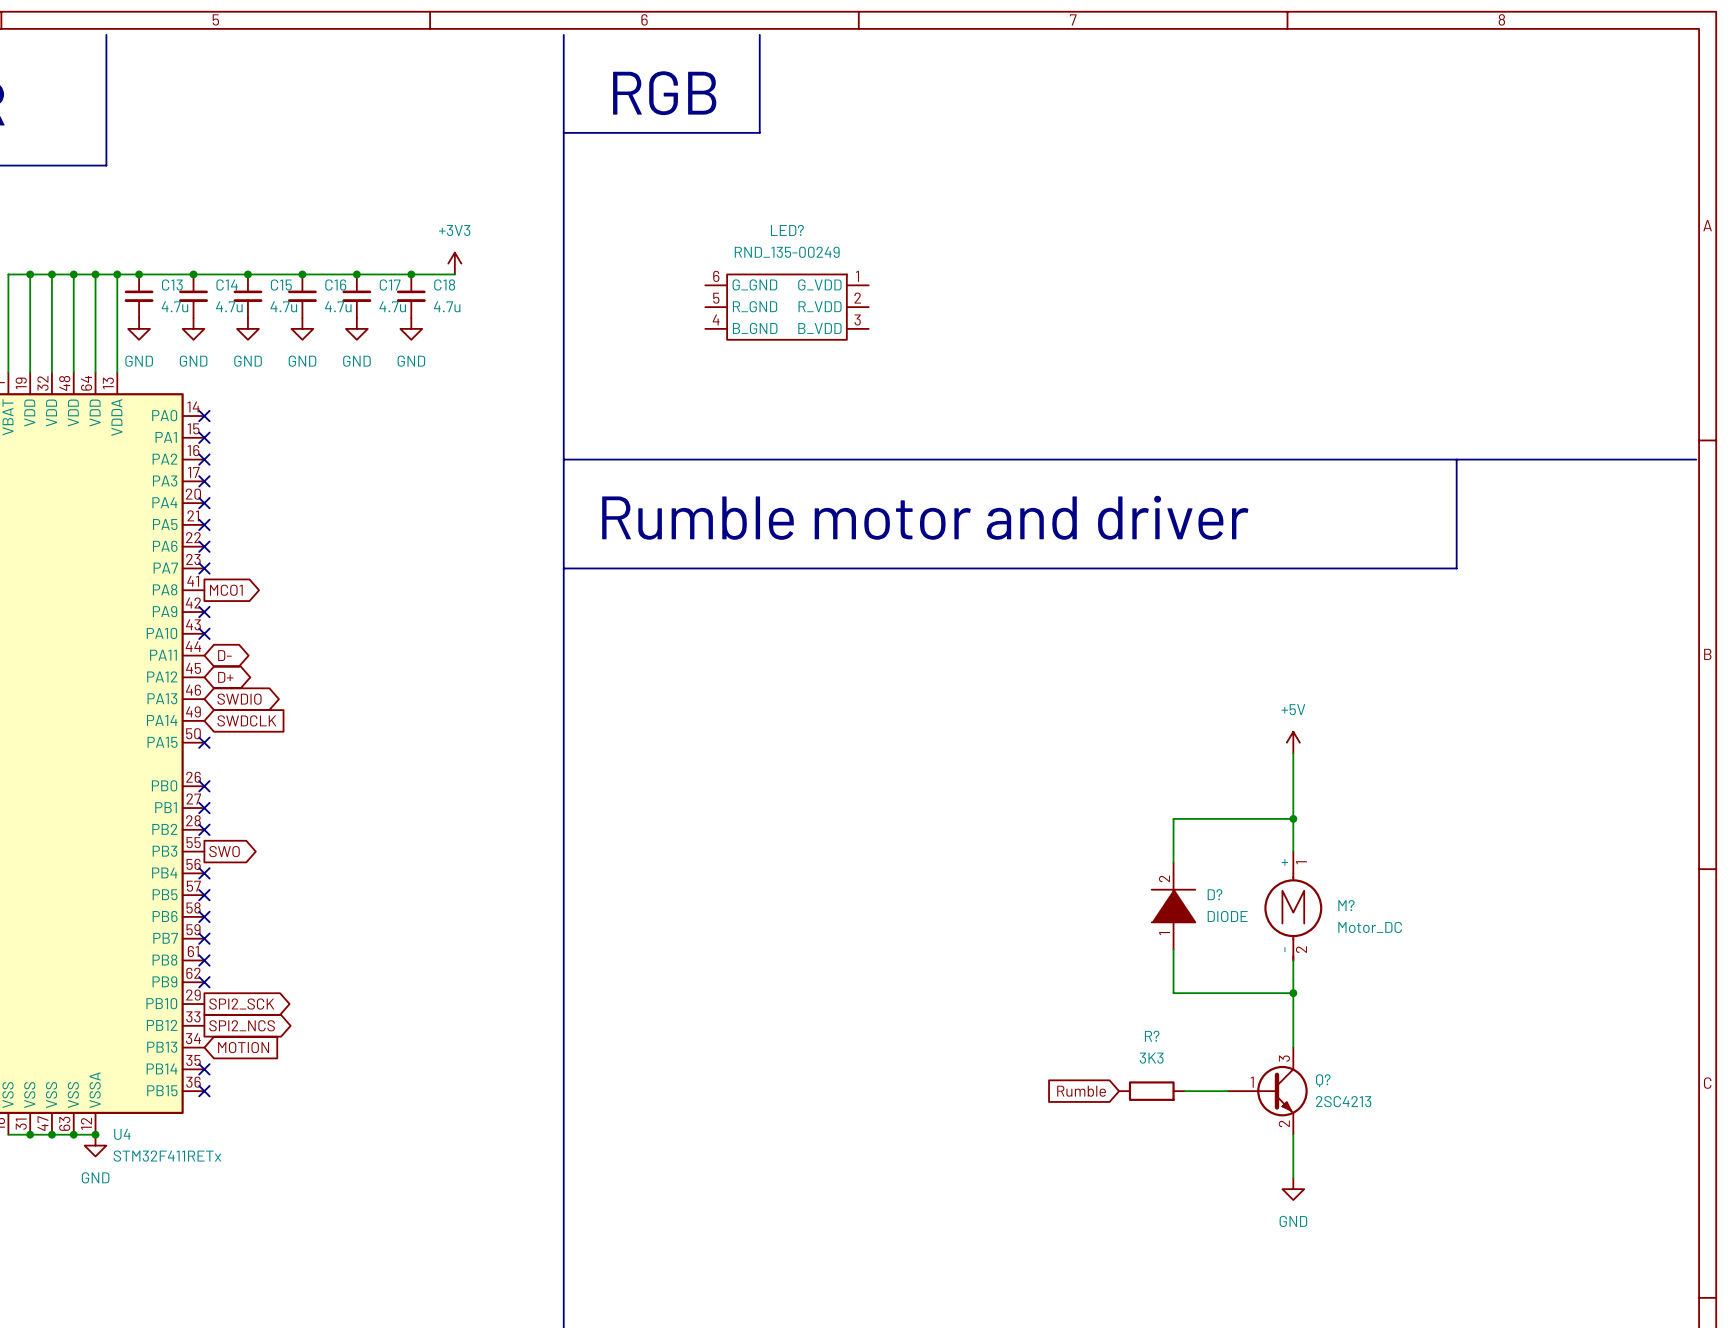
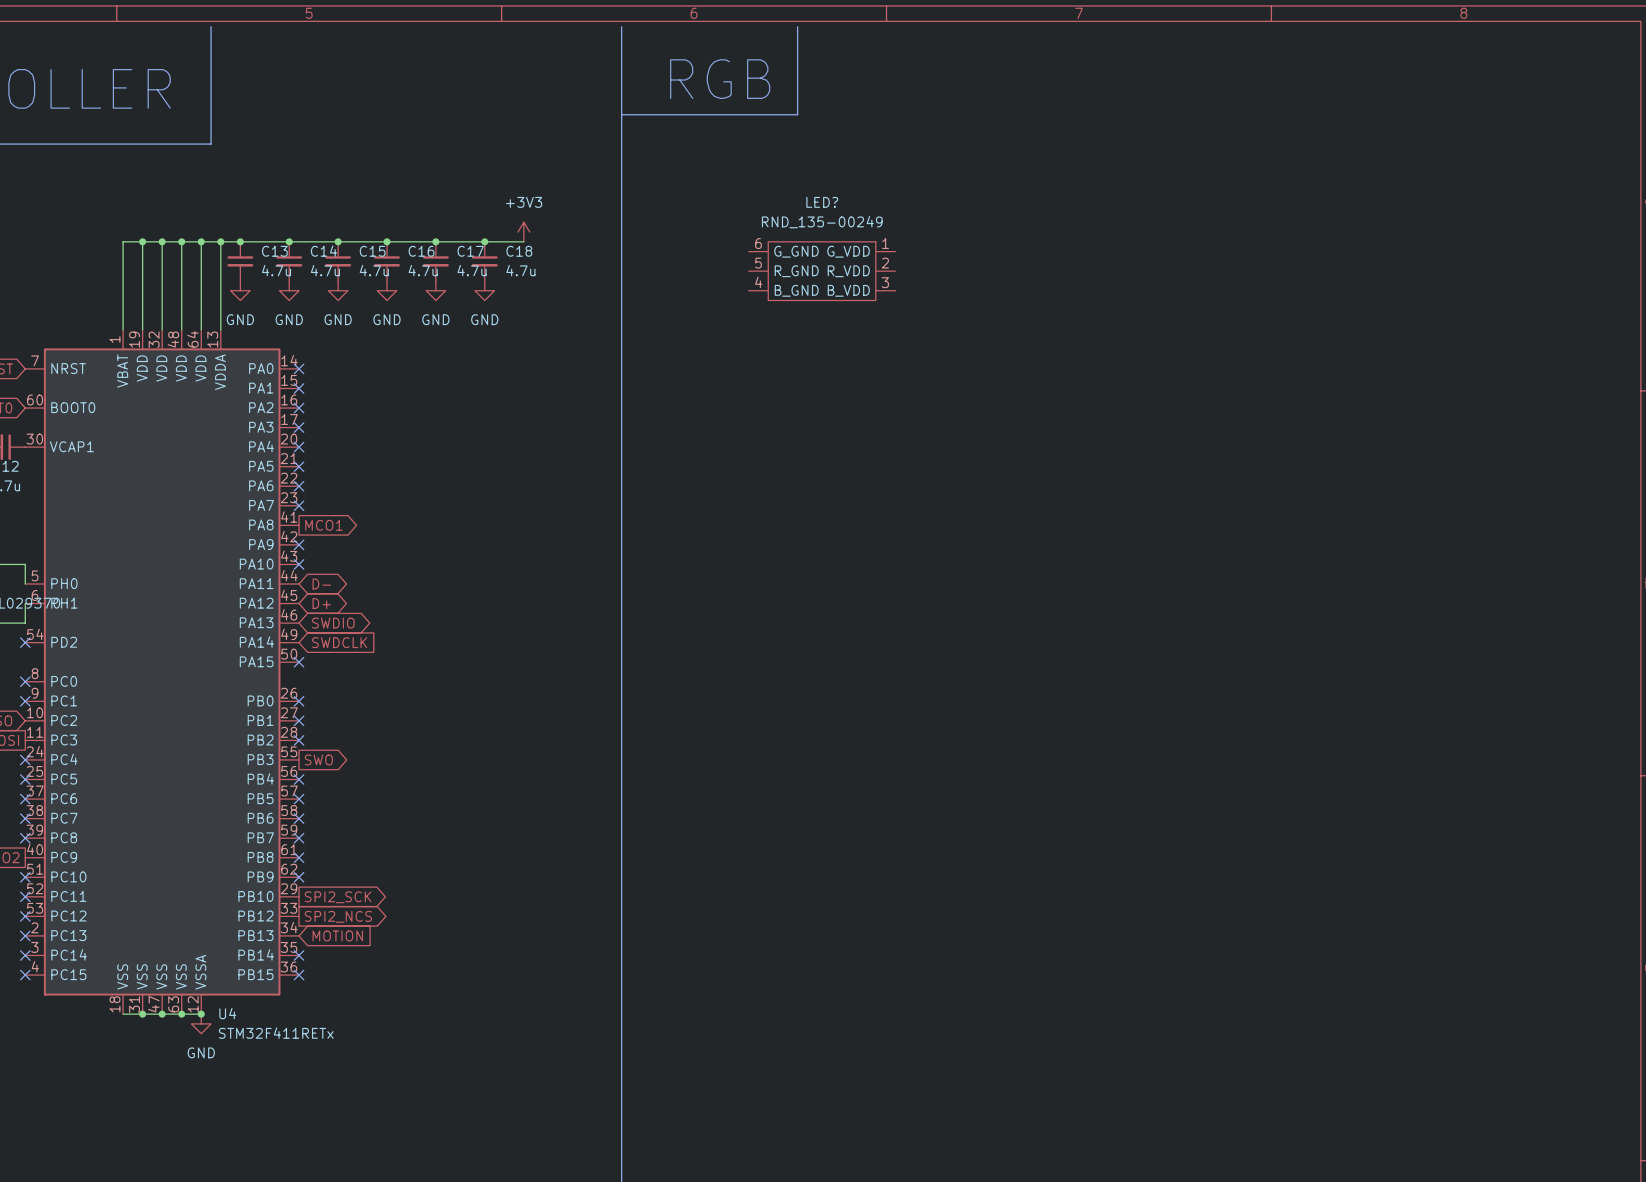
line: (563, 459) (1696, 459) -> none
line: (1456, 459) (1456, 568) (563, 568) -> none
text: Rumble motor and driver (925, 517) -> none
power symbol: +5V (1293, 742) -> none
wire: (1293, 753) (1293, 851) -> none
wire: (1293, 818) (1173, 818) (1173, 862) -> none
junction: (1293, 818) -> none
D?: DIODE (1173, 906) -> none
M?: Motor_DC (1293, 906) -> none
wire: (1173, 949) (1173, 993) (1293, 993) -> none
wire: (1293, 960) (1293, 1047) -> none
junction: (1293, 993) -> none
global label: Rumble (1081, 1091) -> none
R?: 3K3 (1151, 1091) -> none
wire: (1184, 1091) (1227, 1091) -> none
Q?: 2SC4213 (1267, 1091) -> none
wire: (1293, 1134) (1293, 1178) -> none
power symbol: GND (1293, 1189) -> none

